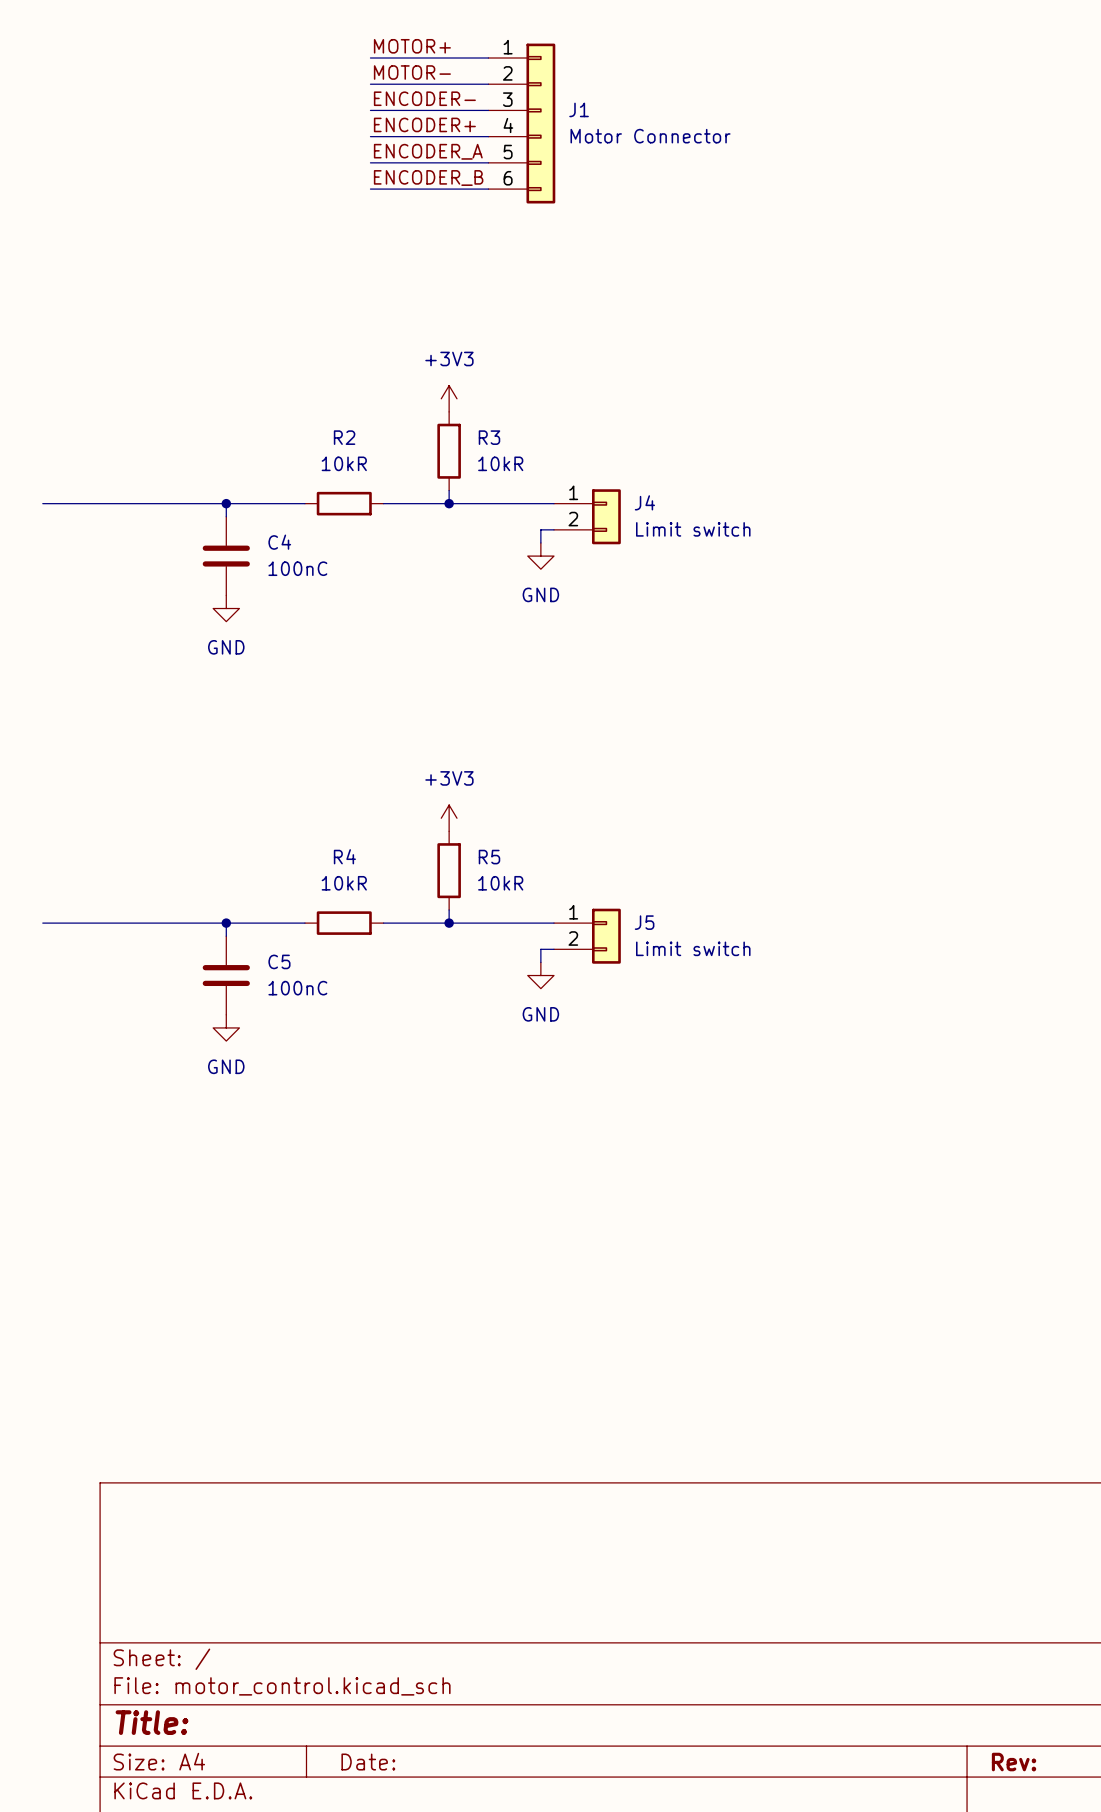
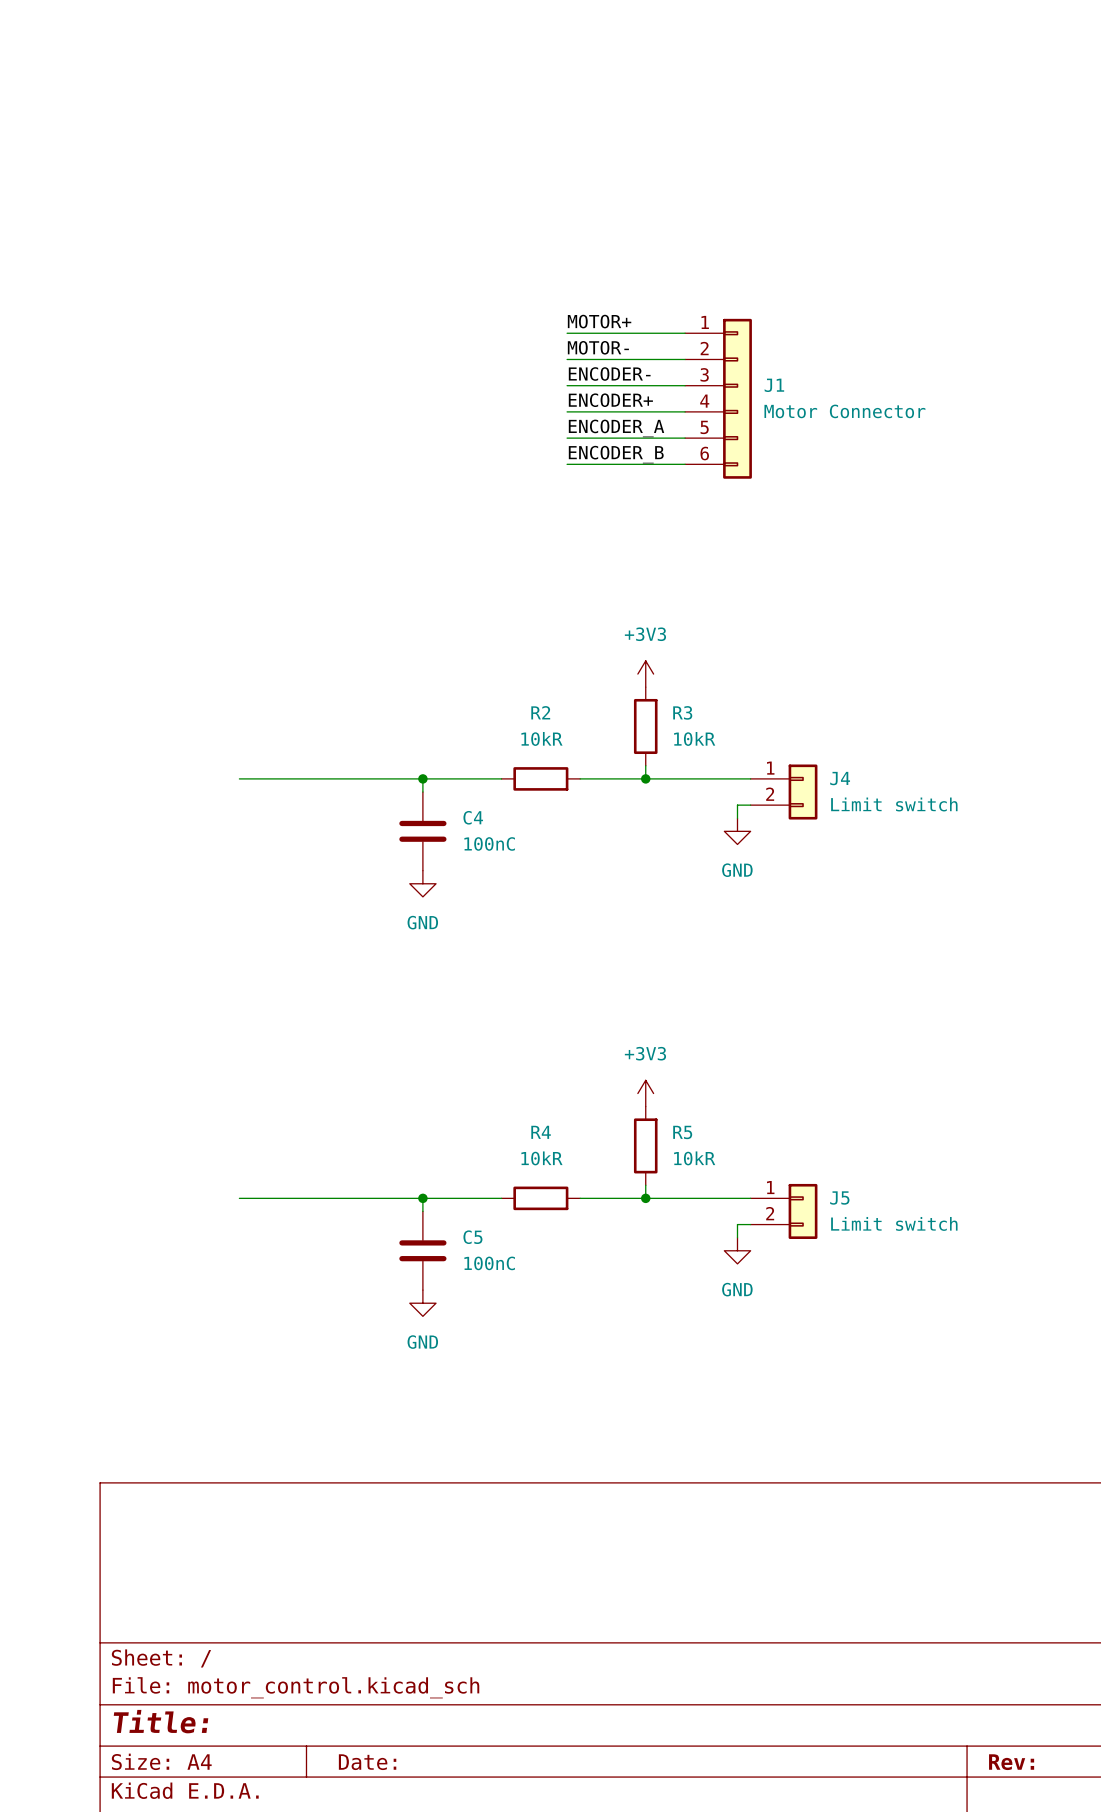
label: MOTOR+ (412, 46) -> none
wire: (370, 58) (488, 58) -> none
label: MOTOR- (412, 72) -> none
wire: (370, 84) (488, 84) -> none
label: ENCODER- (424, 98) -> none
wire: (370, 110) (488, 110) -> none
J1 position: (521, 123) -> (718, 398)
label: ENCODER+ (424, 124) -> none
wire: (370, 136) (488, 136) -> none
label: ENCODER_A (428, 151) -> none
wire: (370, 162) (488, 162) -> none
label: ENCODER_B (428, 178) -> none
wire: (370, 189) (488, 189) -> (567, 333) (685, 333)
label: none -> MOTOR+ (599, 321)
label: none -> MOTOR- (598, 347)
wire: none -> (567, 359) (685, 359)
label: none -> ENCODER- (609, 374)
wire: none -> (567, 385) (685, 385)
power symbol: +3V3 (449, 398) -> none
label: none -> ENCODER+ (610, 400)
wire: none -> (567, 411) (685, 411)
label: none -> ENCODER_A (616, 428)
wire: none -> (567, 438) (685, 438)
R3 position: (449, 451) -> (645, 726)
label: none -> ENCODER_B (616, 454)
wire: none -> (567, 464) (685, 464)
wire: (449, 490) (449, 503) -> none
wire: (42, 503) (304, 503) -> none
wire: (226, 503) (226, 516) -> none
junction: (226, 503) -> none
R2 position: (344, 503) -> (540, 778)
wire: (383, 503) (553, 503) -> none
junction: (449, 503) -> none
J4 position: (587, 516) -> (784, 792)
wire: (553, 529) (540, 529) (540, 542) -> none
C4 position: (226, 556) -> (422, 831)
power symbol: GND (540, 556) -> none
power symbol: GND (226, 608) -> none
power symbol: none -> +3V3 (645, 674)
junction: none -> (422, 778)
junction: none -> (645, 778)
power symbol: +3V3 (449, 818) -> none
power symbol: none -> GND (737, 831)
R5 position: (449, 870) -> (645, 1145)
power symbol: none -> GND (422, 883)
wire: (449, 909) (449, 923) -> (645, 765) (645, 778)
wire: (42, 923) (304, 923) -> (239, 778) (501, 778)
wire: (226, 923) (226, 936) -> (422, 778) (422, 792)
junction: (226, 923) -> none
R4 position: (344, 923) -> (540, 1198)
wire: (383, 923) (553, 923) -> (580, 778) (750, 778)
junction: (449, 923) -> none
J5 position: (587, 936) -> (784, 1211)
wire: (553, 949) (540, 949) (540, 962) -> (750, 805) (737, 805) (737, 818)
C5 position: (226, 975) -> (422, 1250)
power symbol: GND (540, 975) -> none
power symbol: GND (226, 1027) -> none
power symbol: none -> +3V3 (645, 1093)
wire: none -> (645, 1185) (645, 1198)
wire: none -> (239, 1198) (501, 1198)
wire: none -> (422, 1198) (422, 1211)
junction: none -> (422, 1198)
wire: none -> (580, 1198) (750, 1198)
junction: none -> (645, 1198)
wire: none -> (750, 1224) (737, 1224) (737, 1237)
power symbol: none -> GND (737, 1250)
power symbol: none -> GND (422, 1303)

